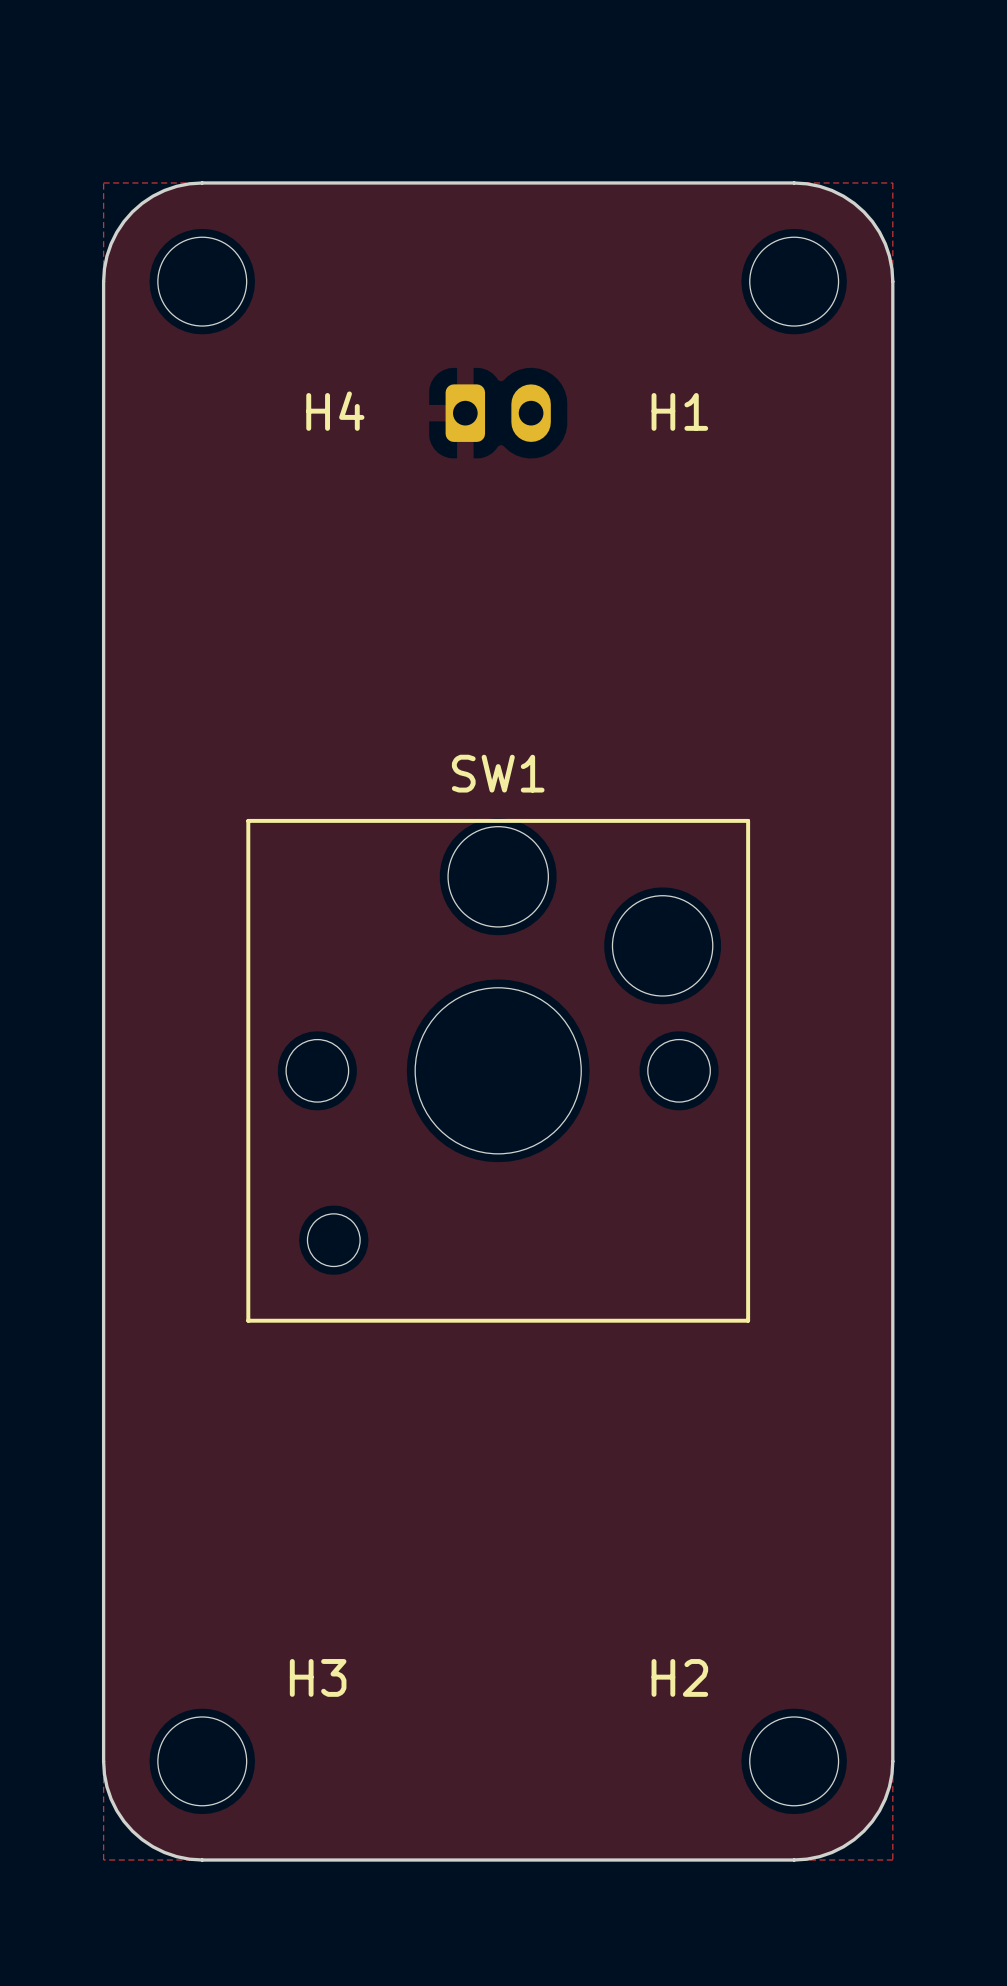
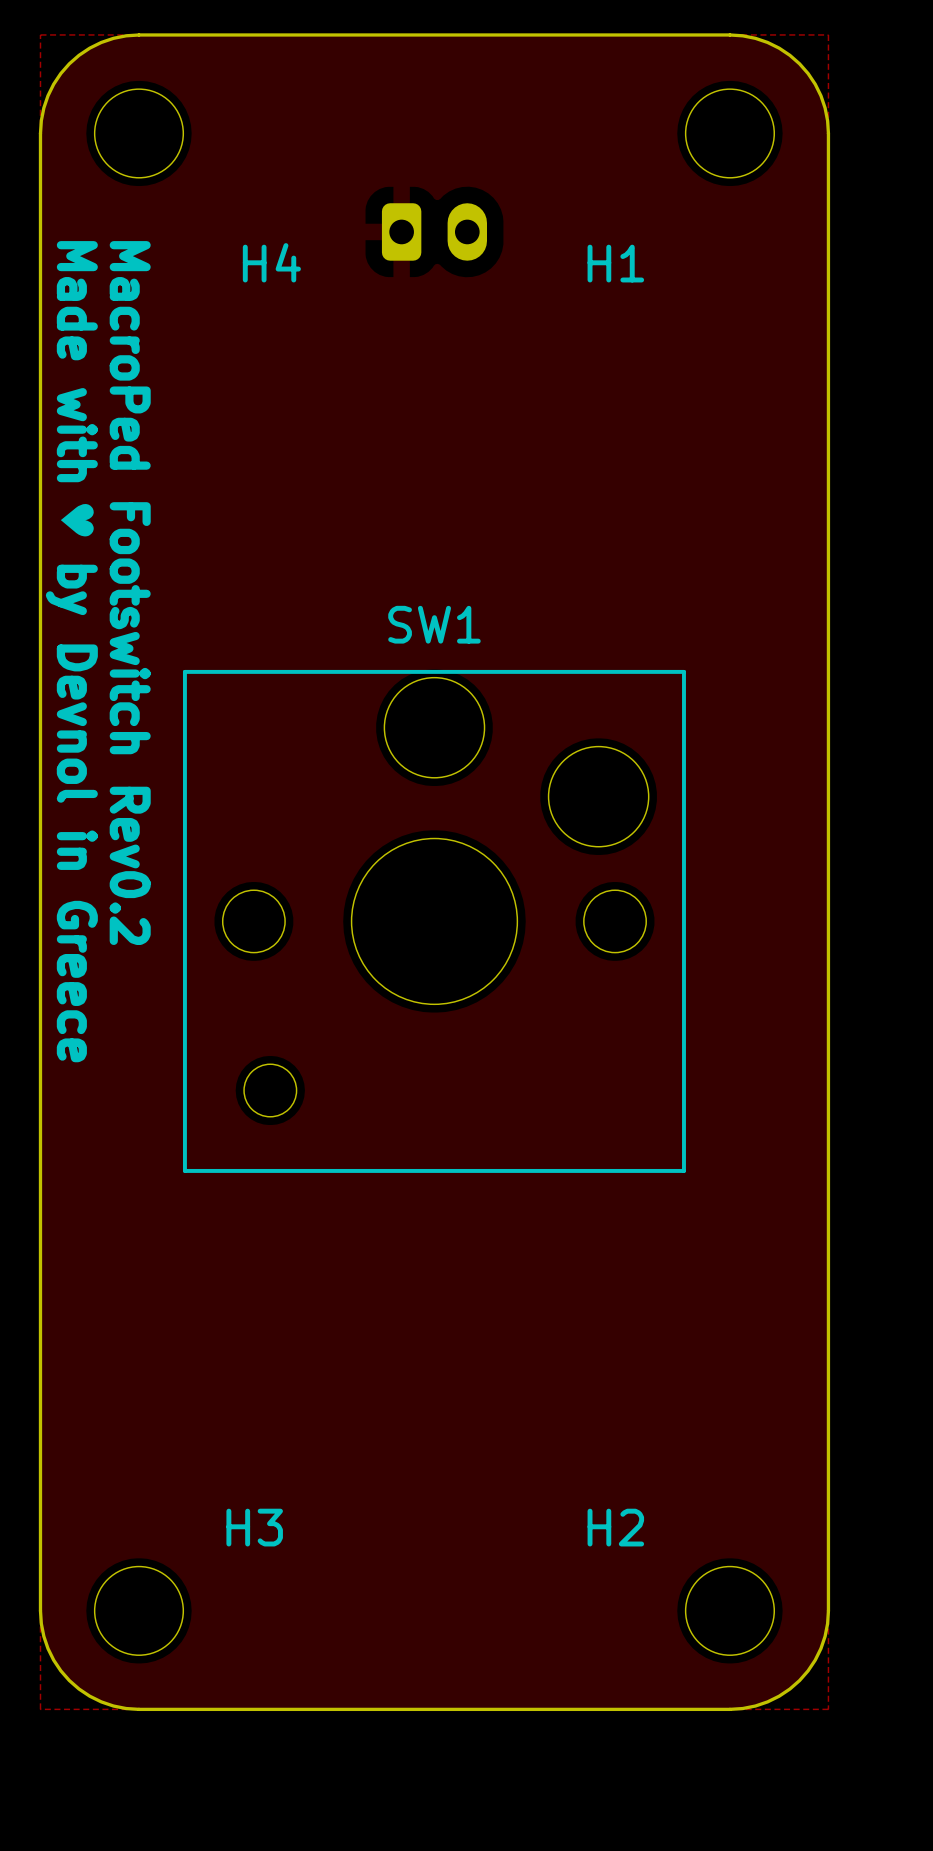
part position: (498, 413) -> (434, 231)
text: none -> ♥︎ (77, 520)
text: none -> MacroPed Footswitch Rev0.2 (130, 593)
text: none -> Made with by Devnol in Greece (71, 651)

